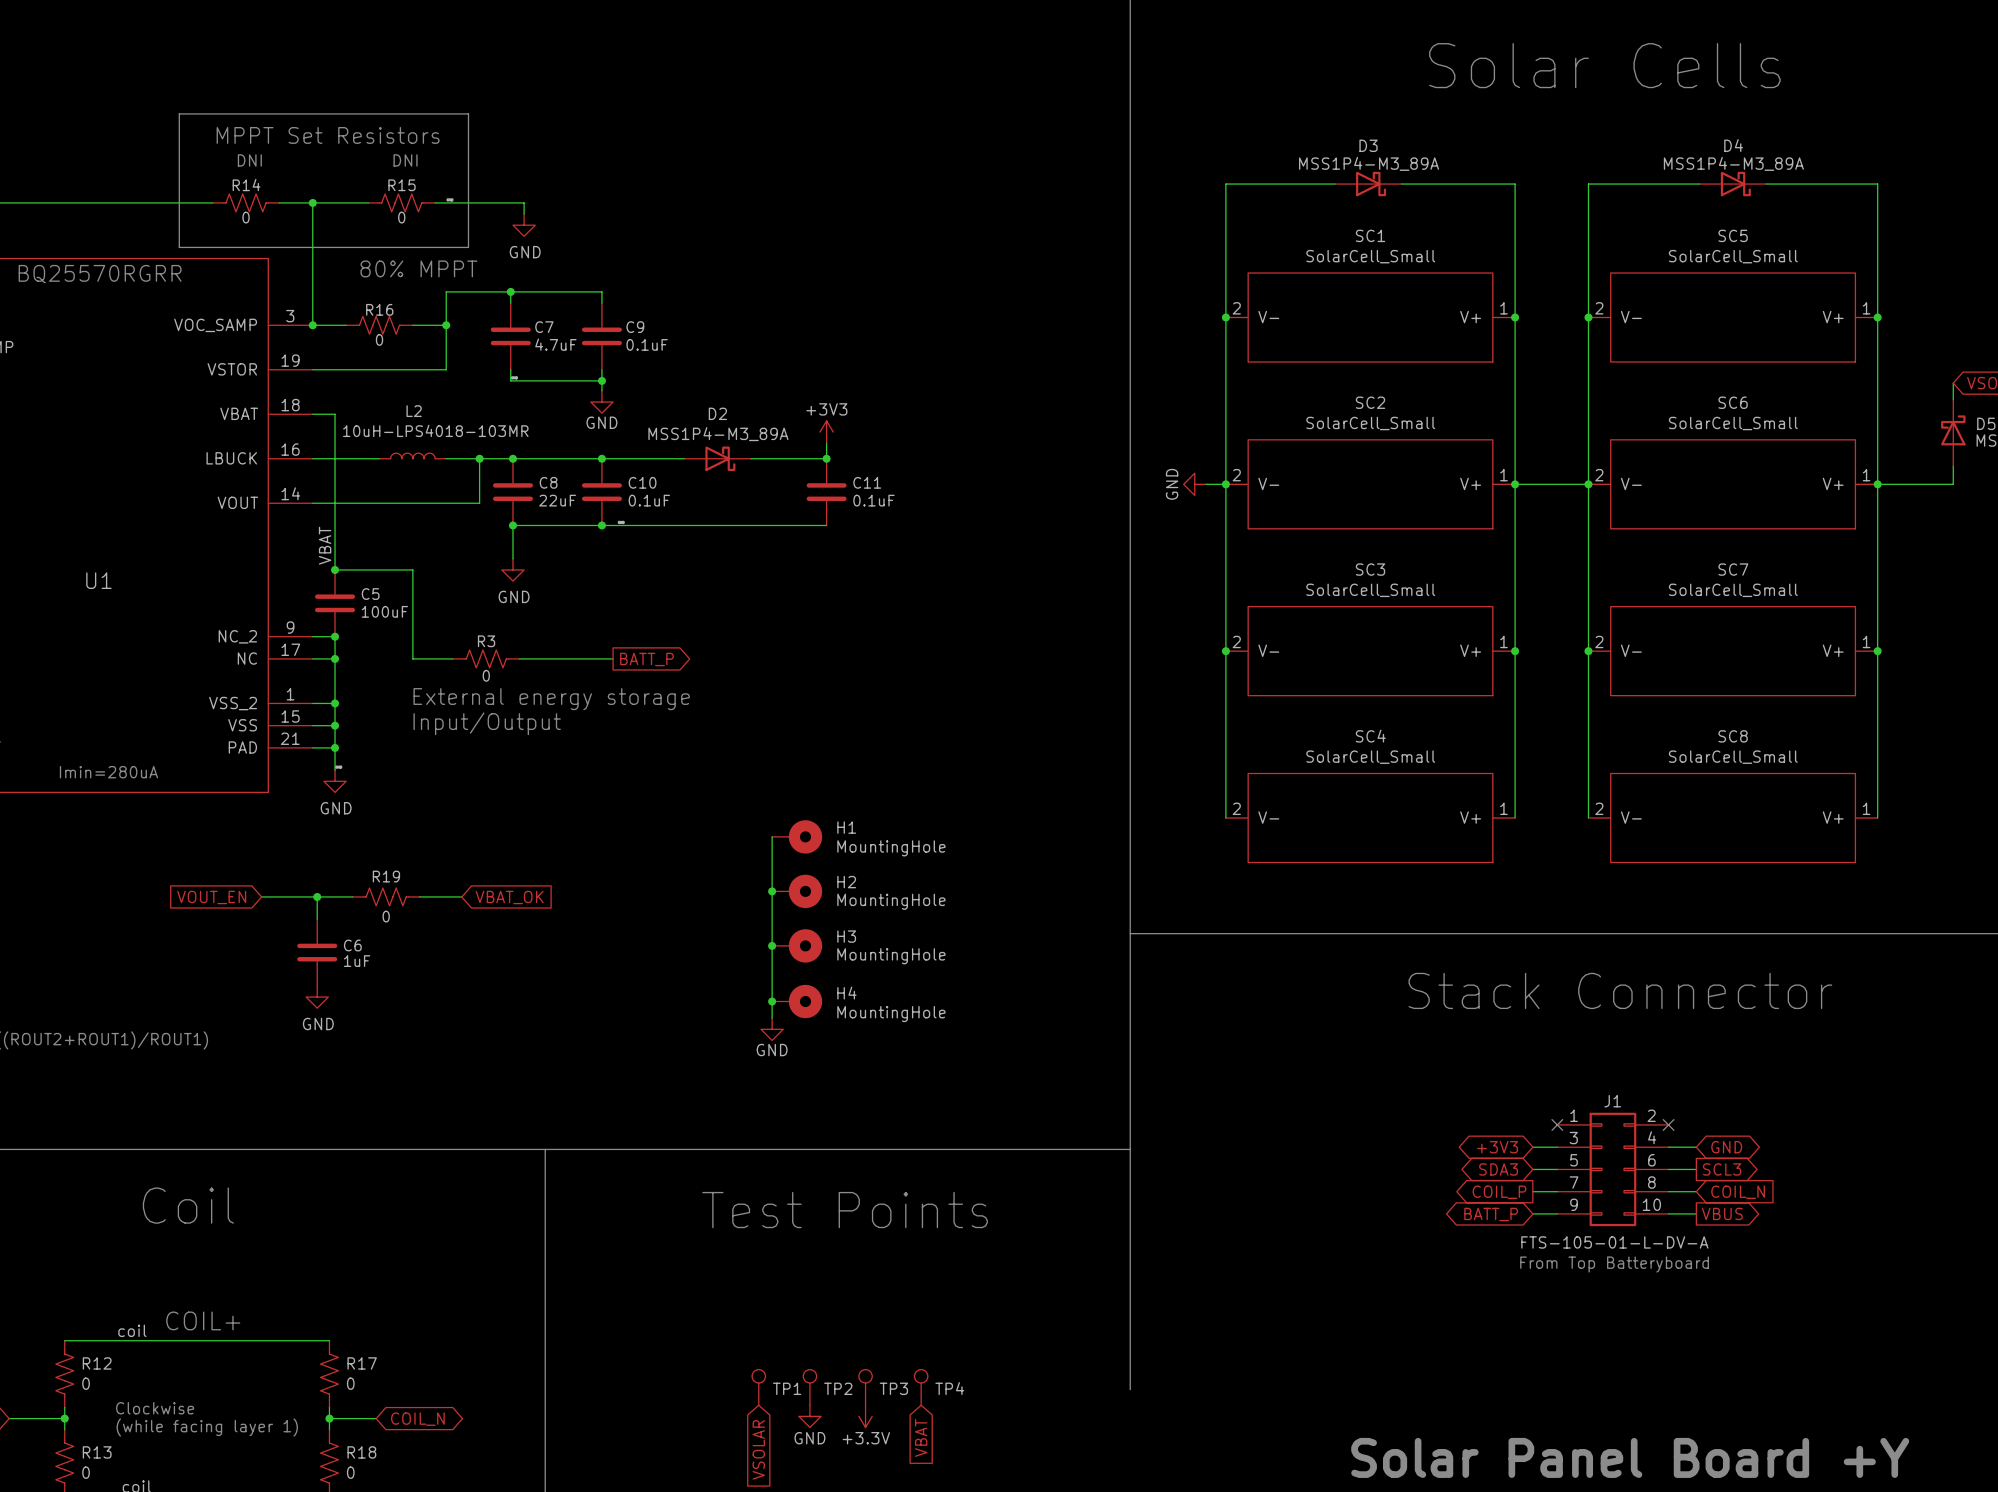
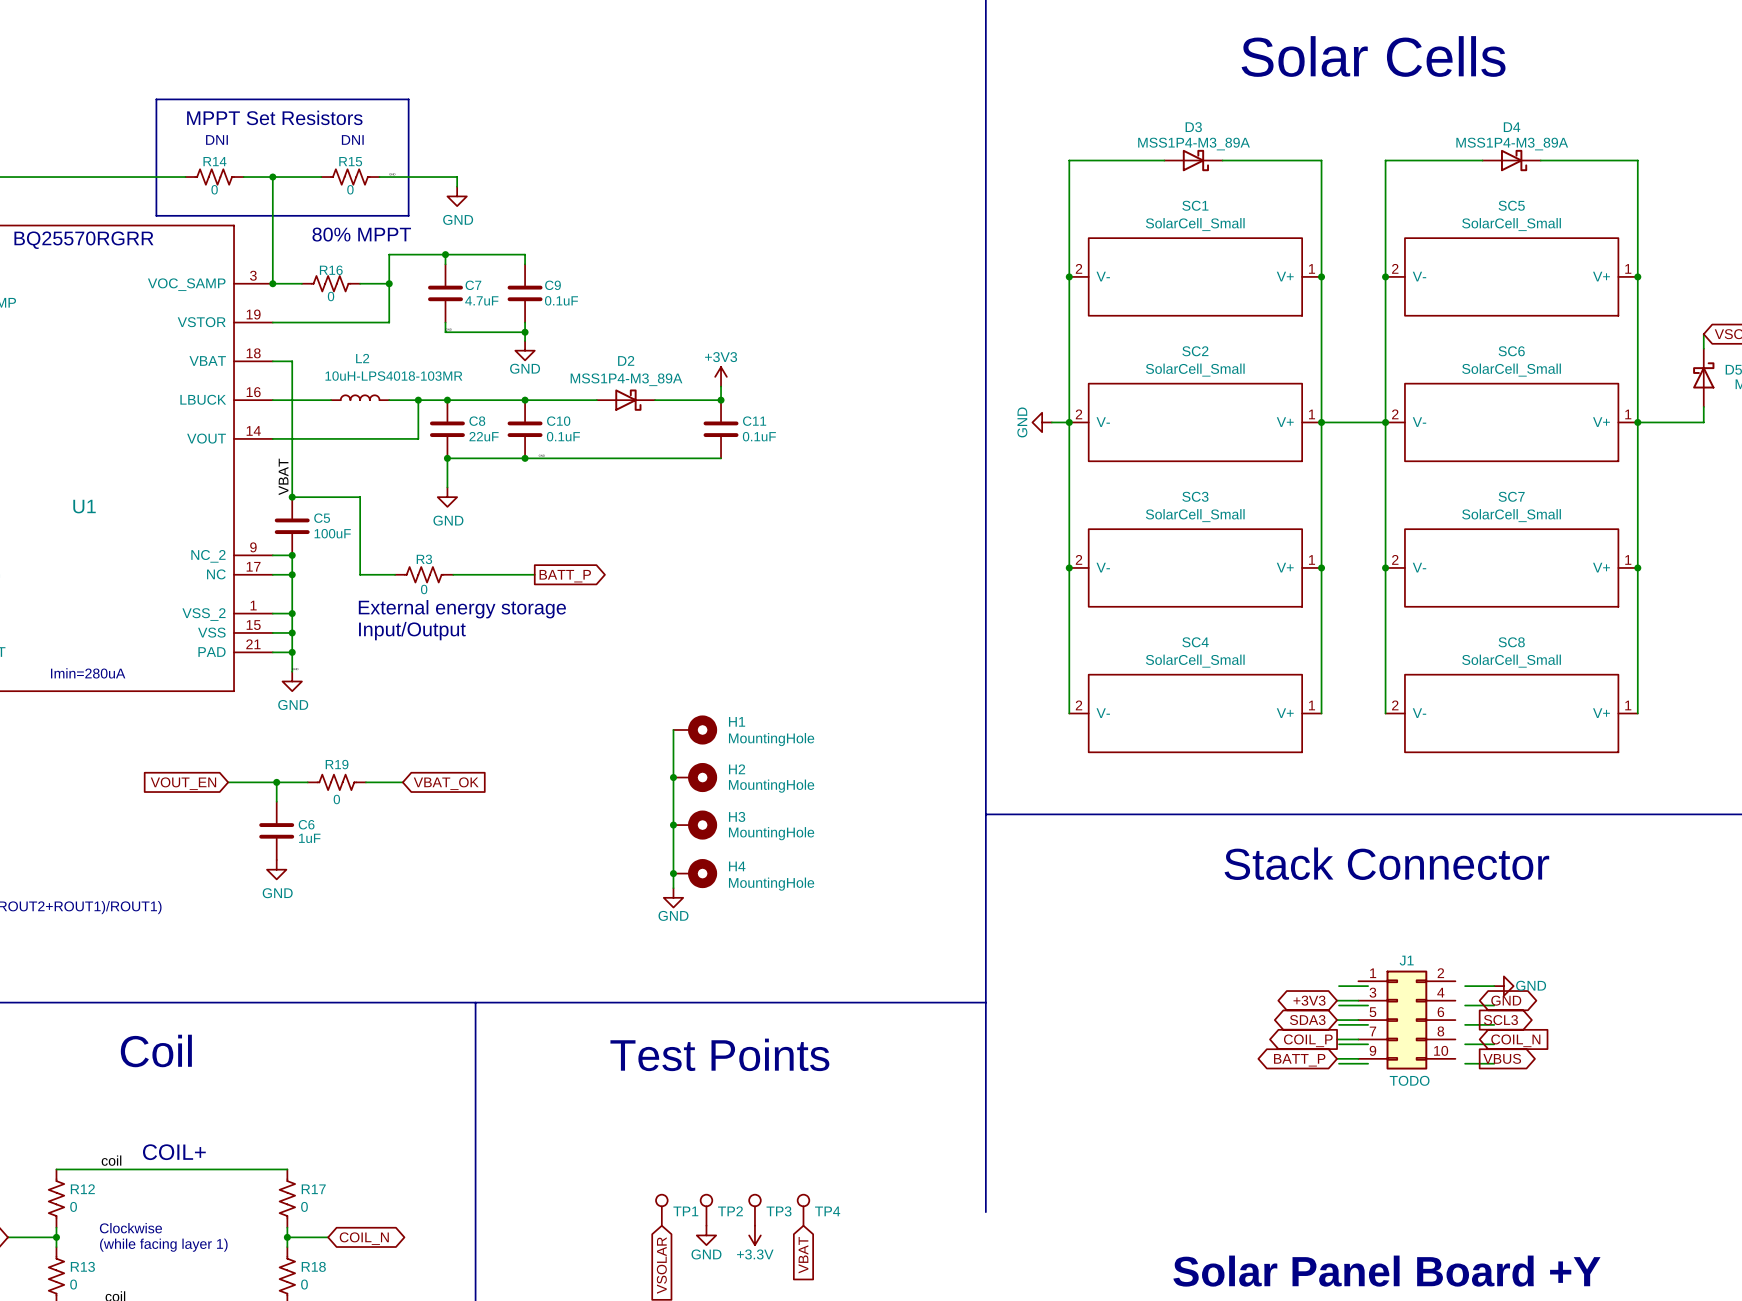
no-connect mark: (1557, 1124) -> none
no-connect mark: (1668, 1124) -> none
wire: none -> (1338, 986) (1368, 986)
wire: none -> (1465, 986) (1494, 986)
power symbol: none -> GND (1503, 986)
wire: (1668, 1147) (1696, 1147) -> none
wire: none -> (1338, 1005) (1368, 1005)
wire: none -> (1465, 1005) (1494, 1005)
wire: (1668, 1169) (1696, 1169) -> none
wire: none -> (1338, 1024) (1368, 1024)
wire: none -> (1465, 1024) (1494, 1024)
wire: (1668, 1191) (1696, 1191) -> none
wire: none -> (1338, 1044) (1368, 1044)
wire: none -> (1465, 1044) (1494, 1044)
wire: (1668, 1213) (1696, 1213) -> none
wire: none -> (1338, 1063) (1368, 1063)
wire: none -> (1465, 1063) (1494, 1063)
J1 value: FTS-105-01-L-DV-A (1614, 1242) -> TODO (1409, 1080)
text: From Top Batteryboard (1614, 1264) -> none

